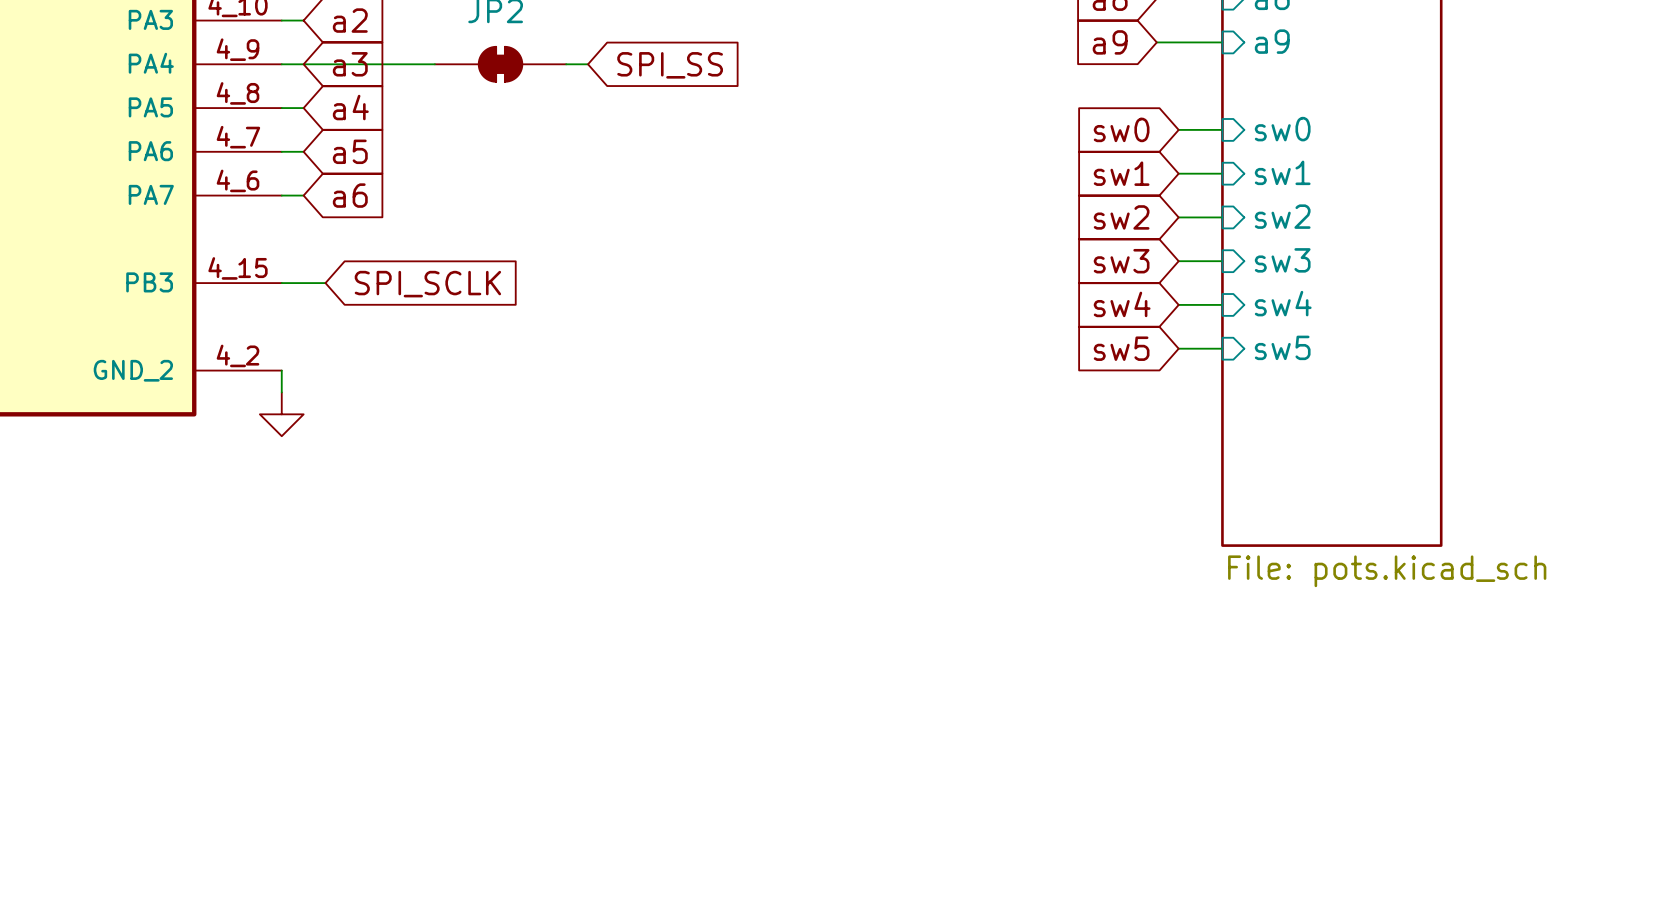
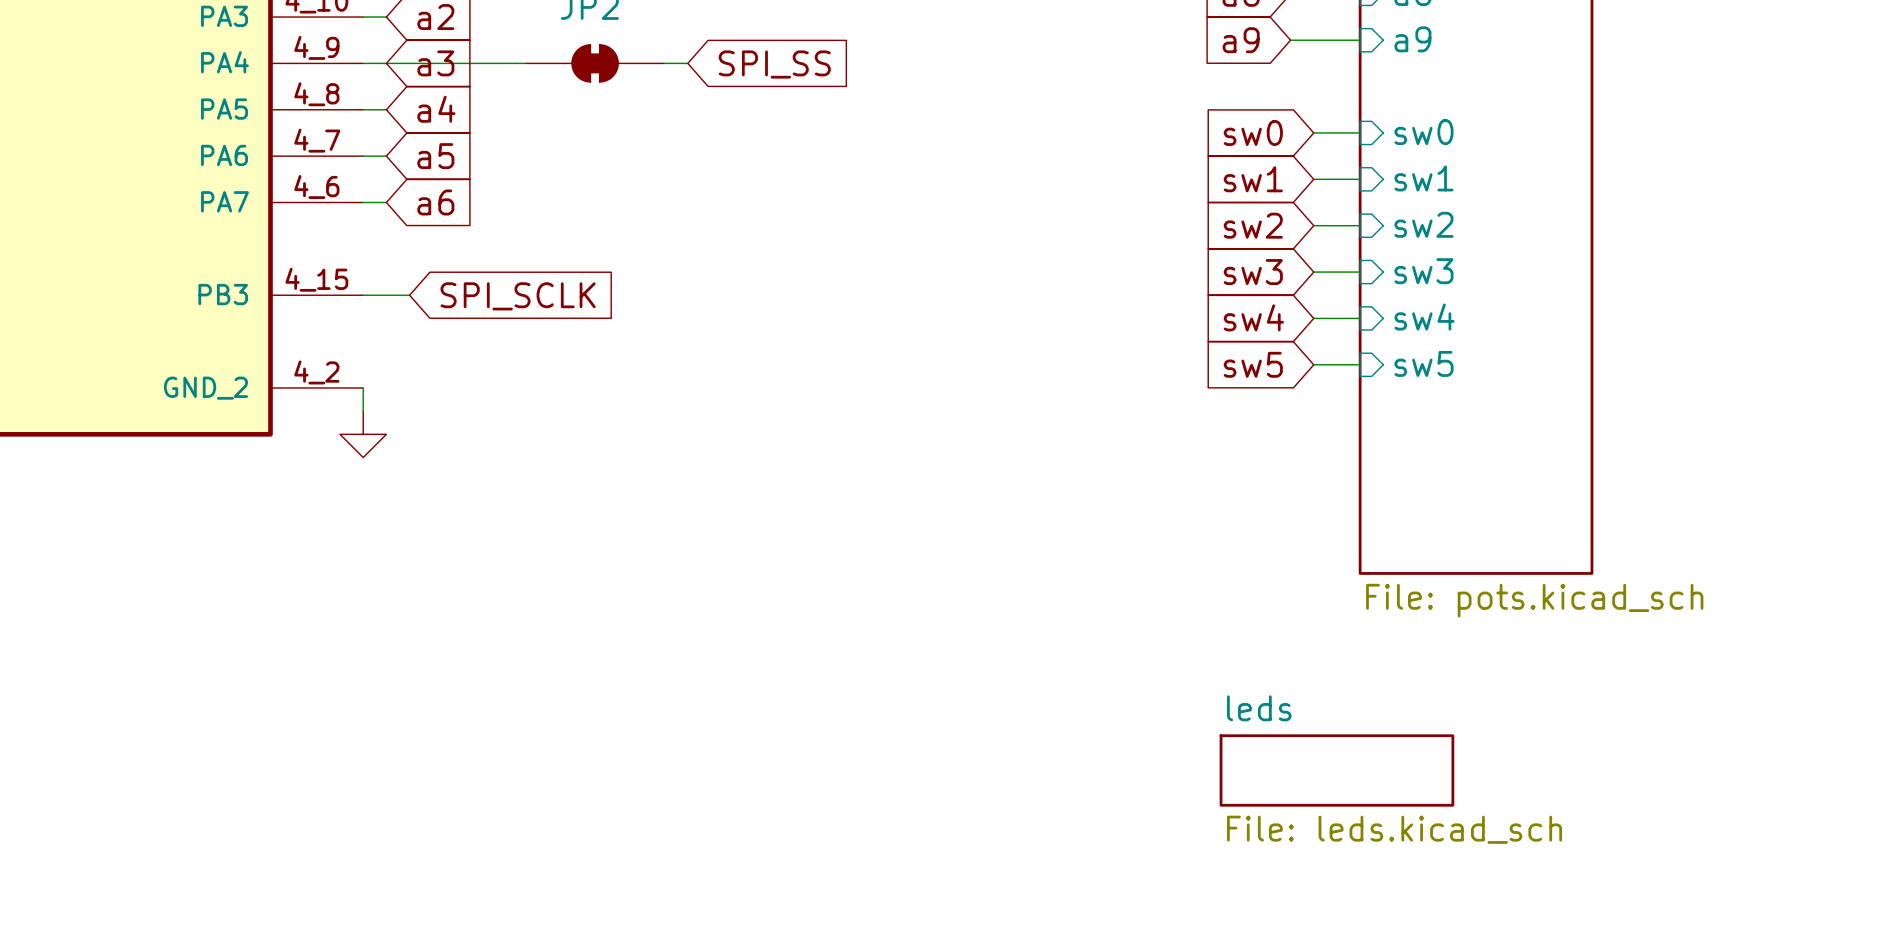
sheet leds: none -> File: leds.kicad_sch (1336, 770)

